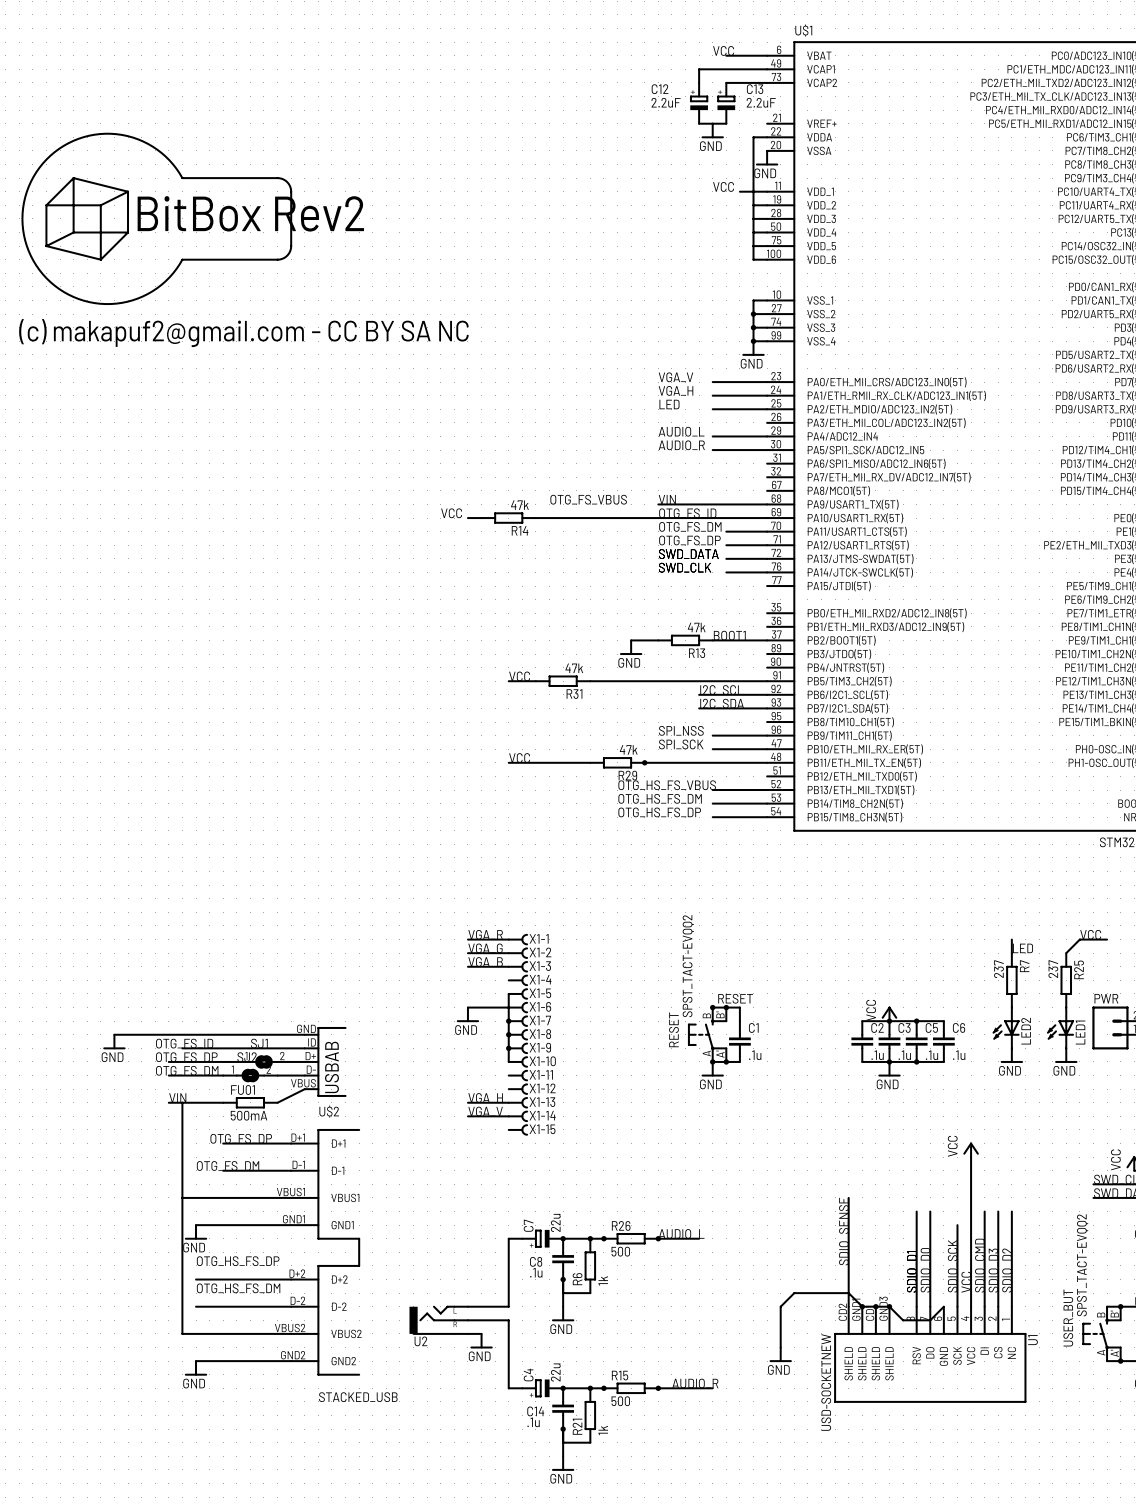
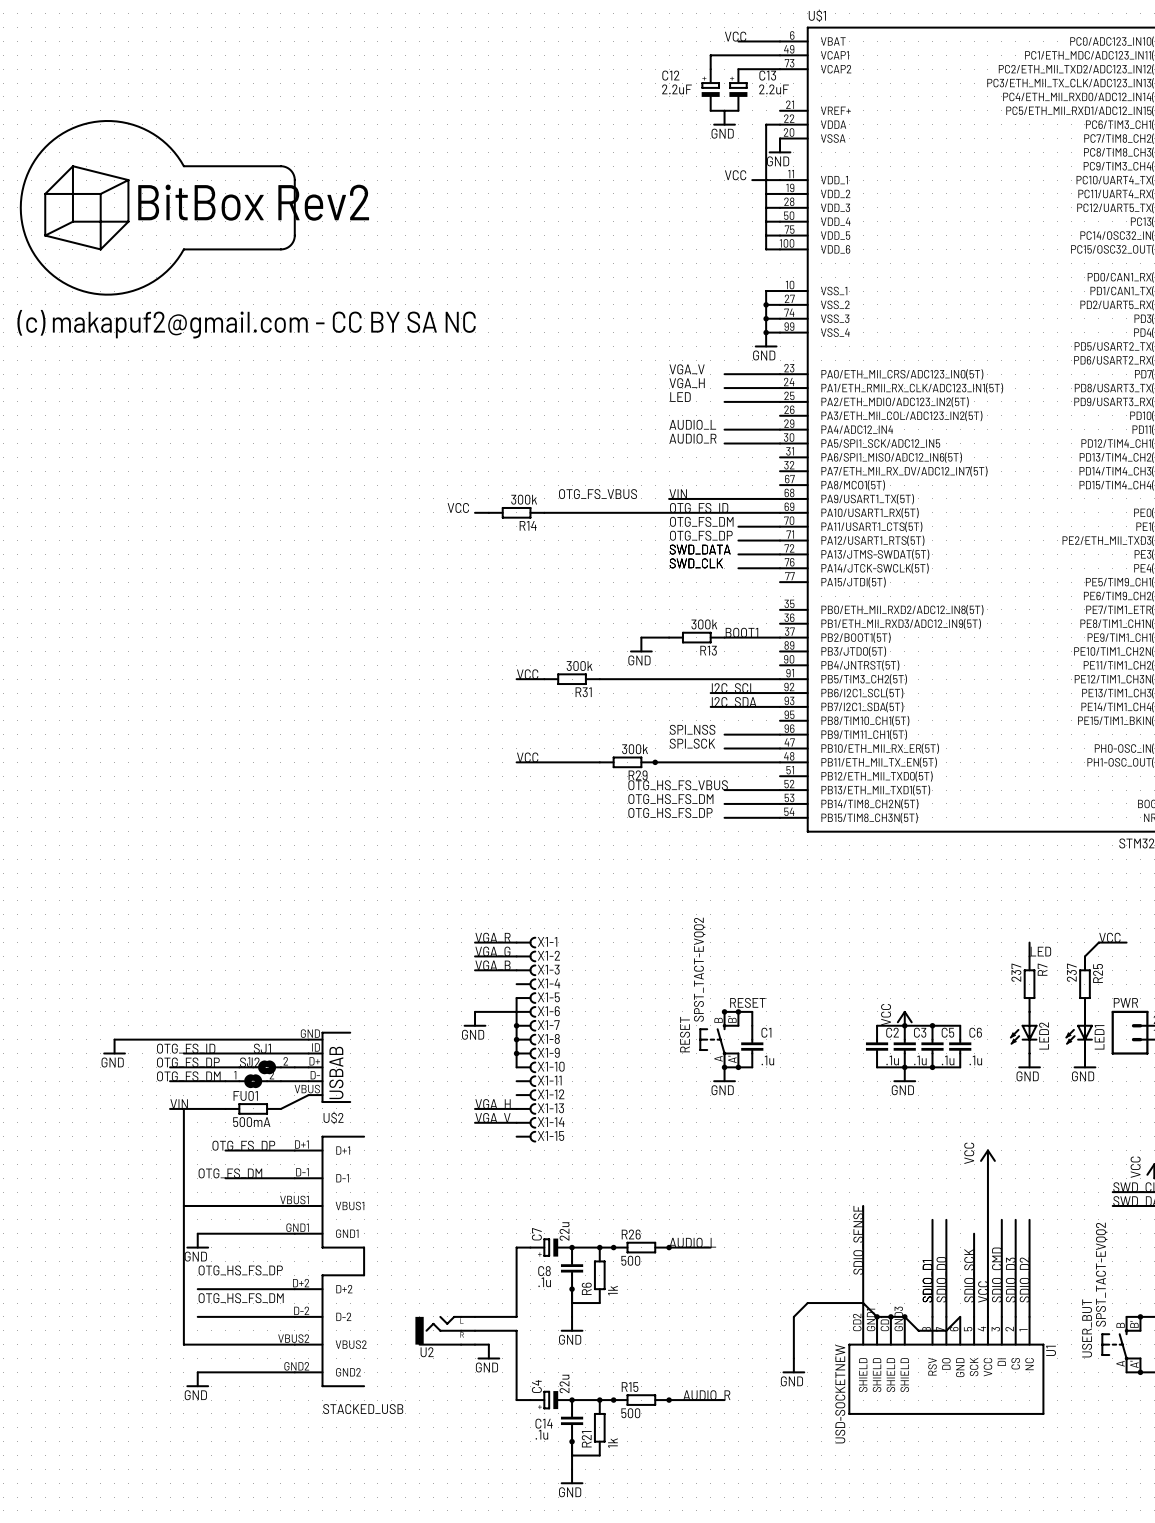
R14 value: 47k (519, 505) -> 300k (524, 499)
R13 value: 47k (696, 627) -> 300k (704, 624)
R31 value: 47k (574, 668) -> 300k (579, 666)
R29 value: 47k (628, 749) -> 300k (635, 749)

